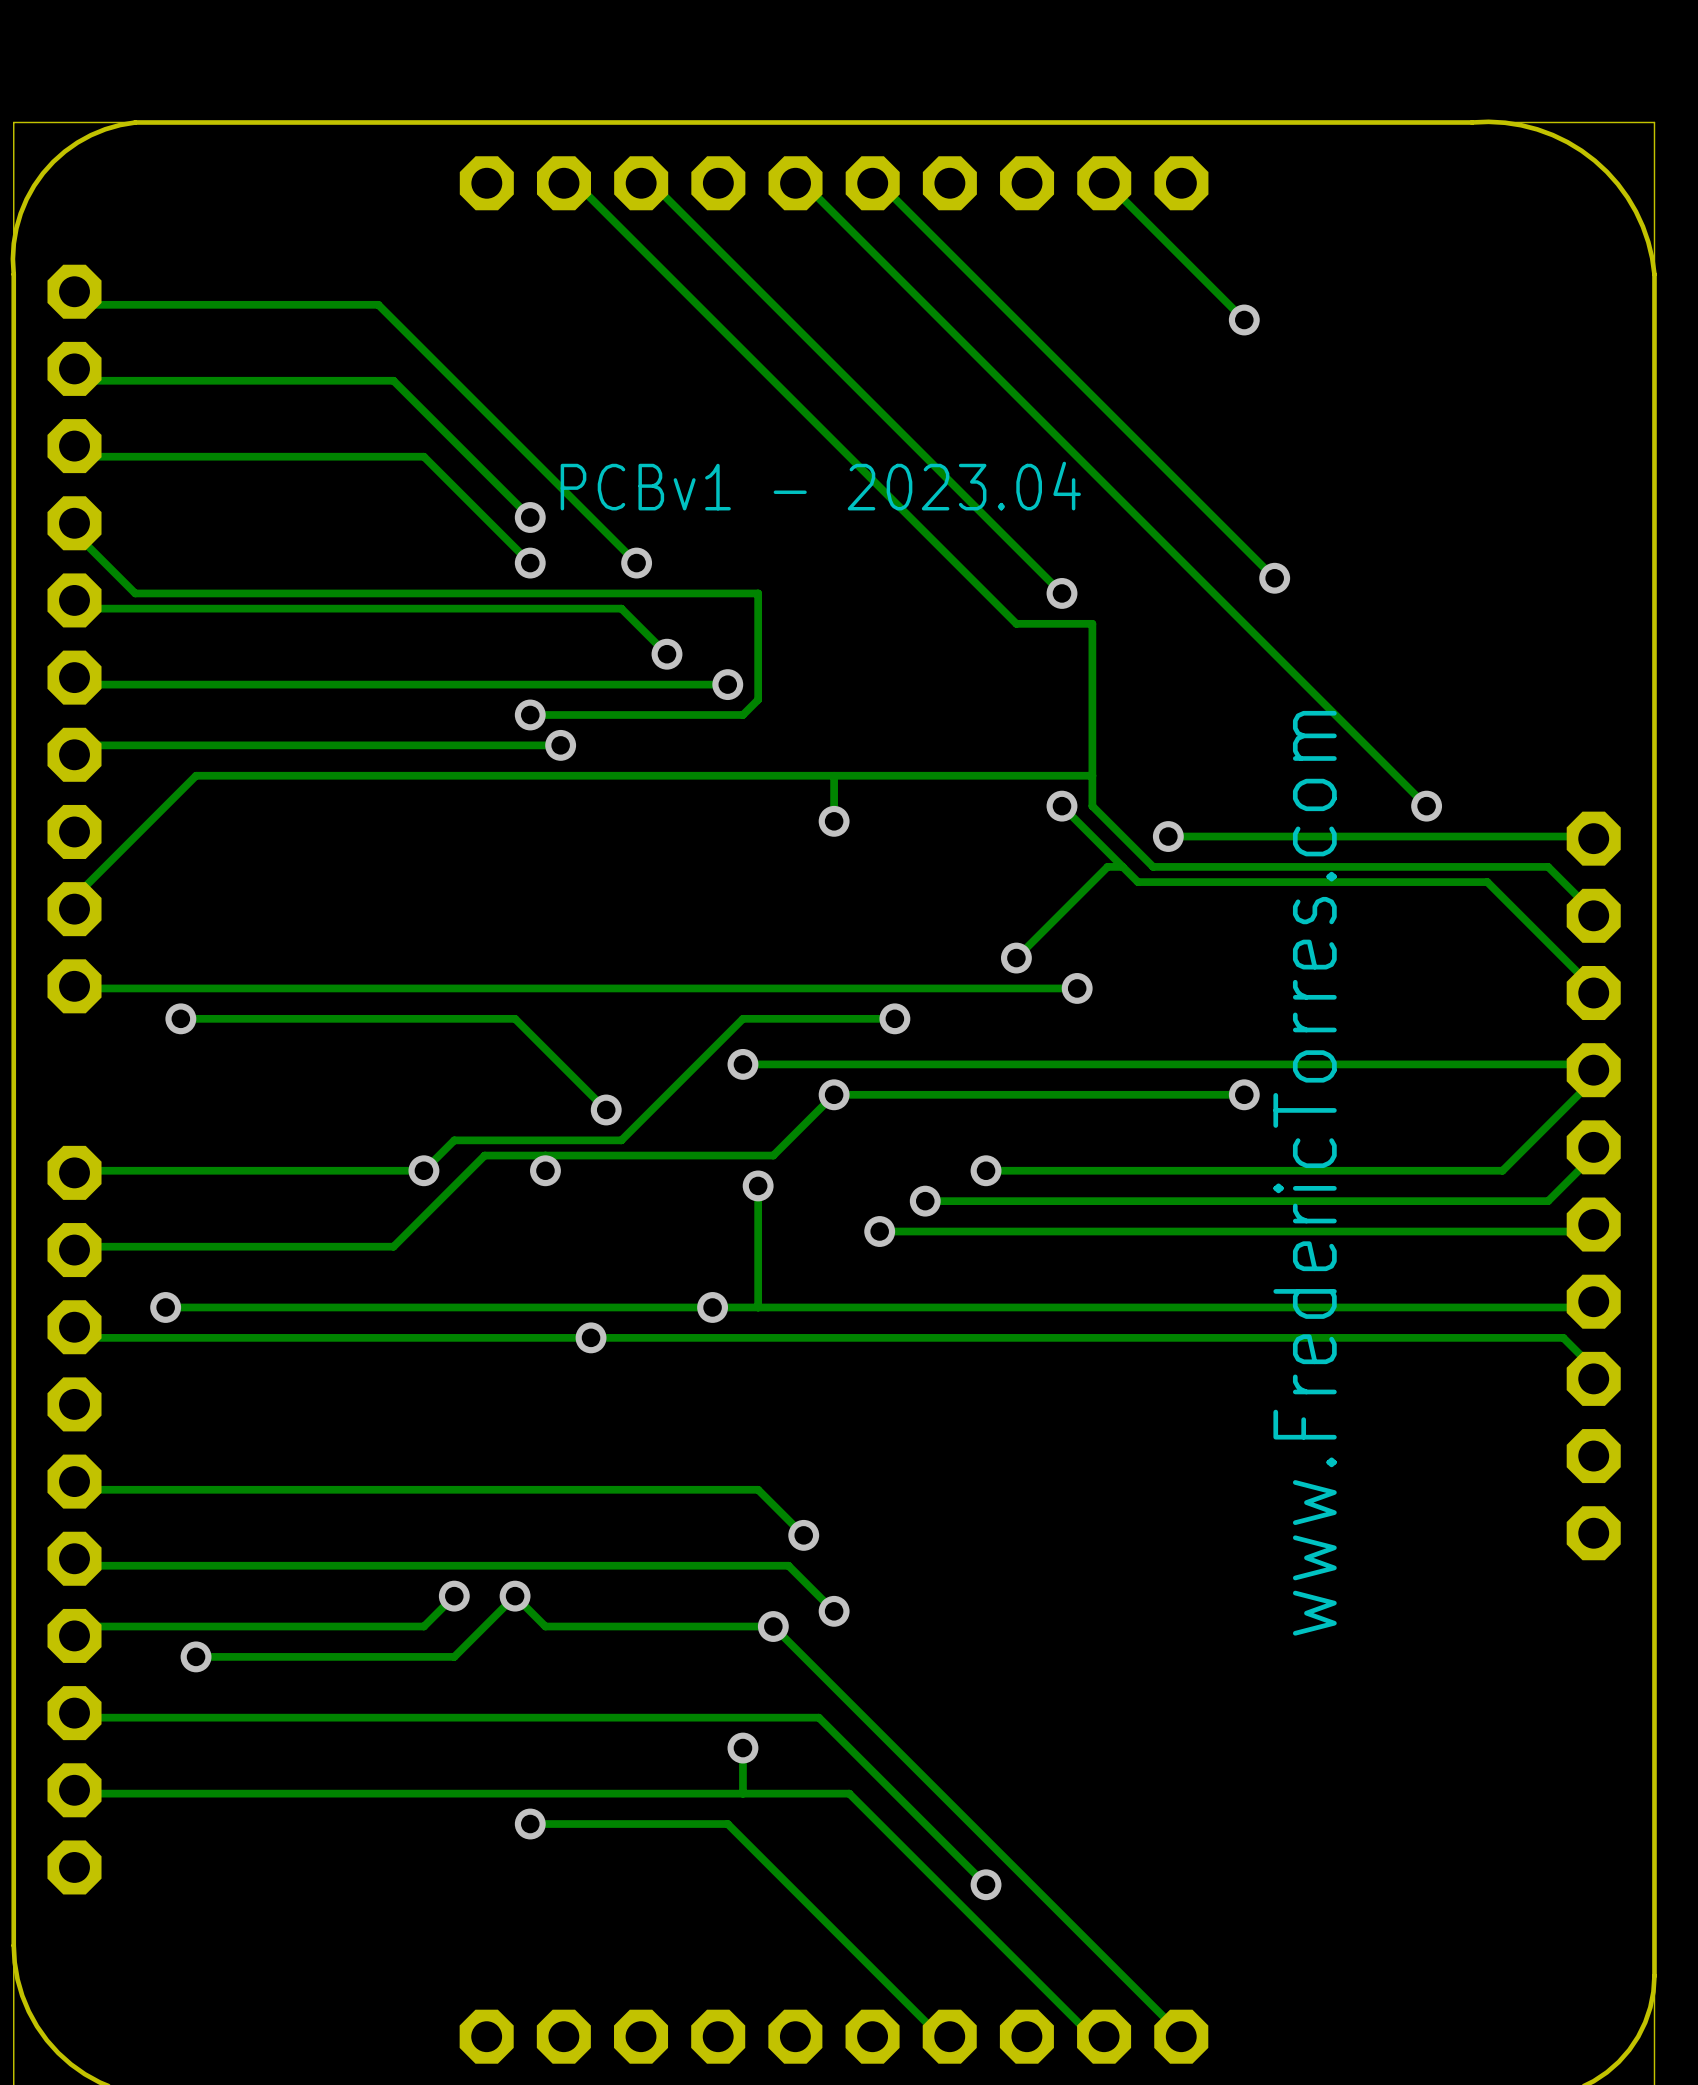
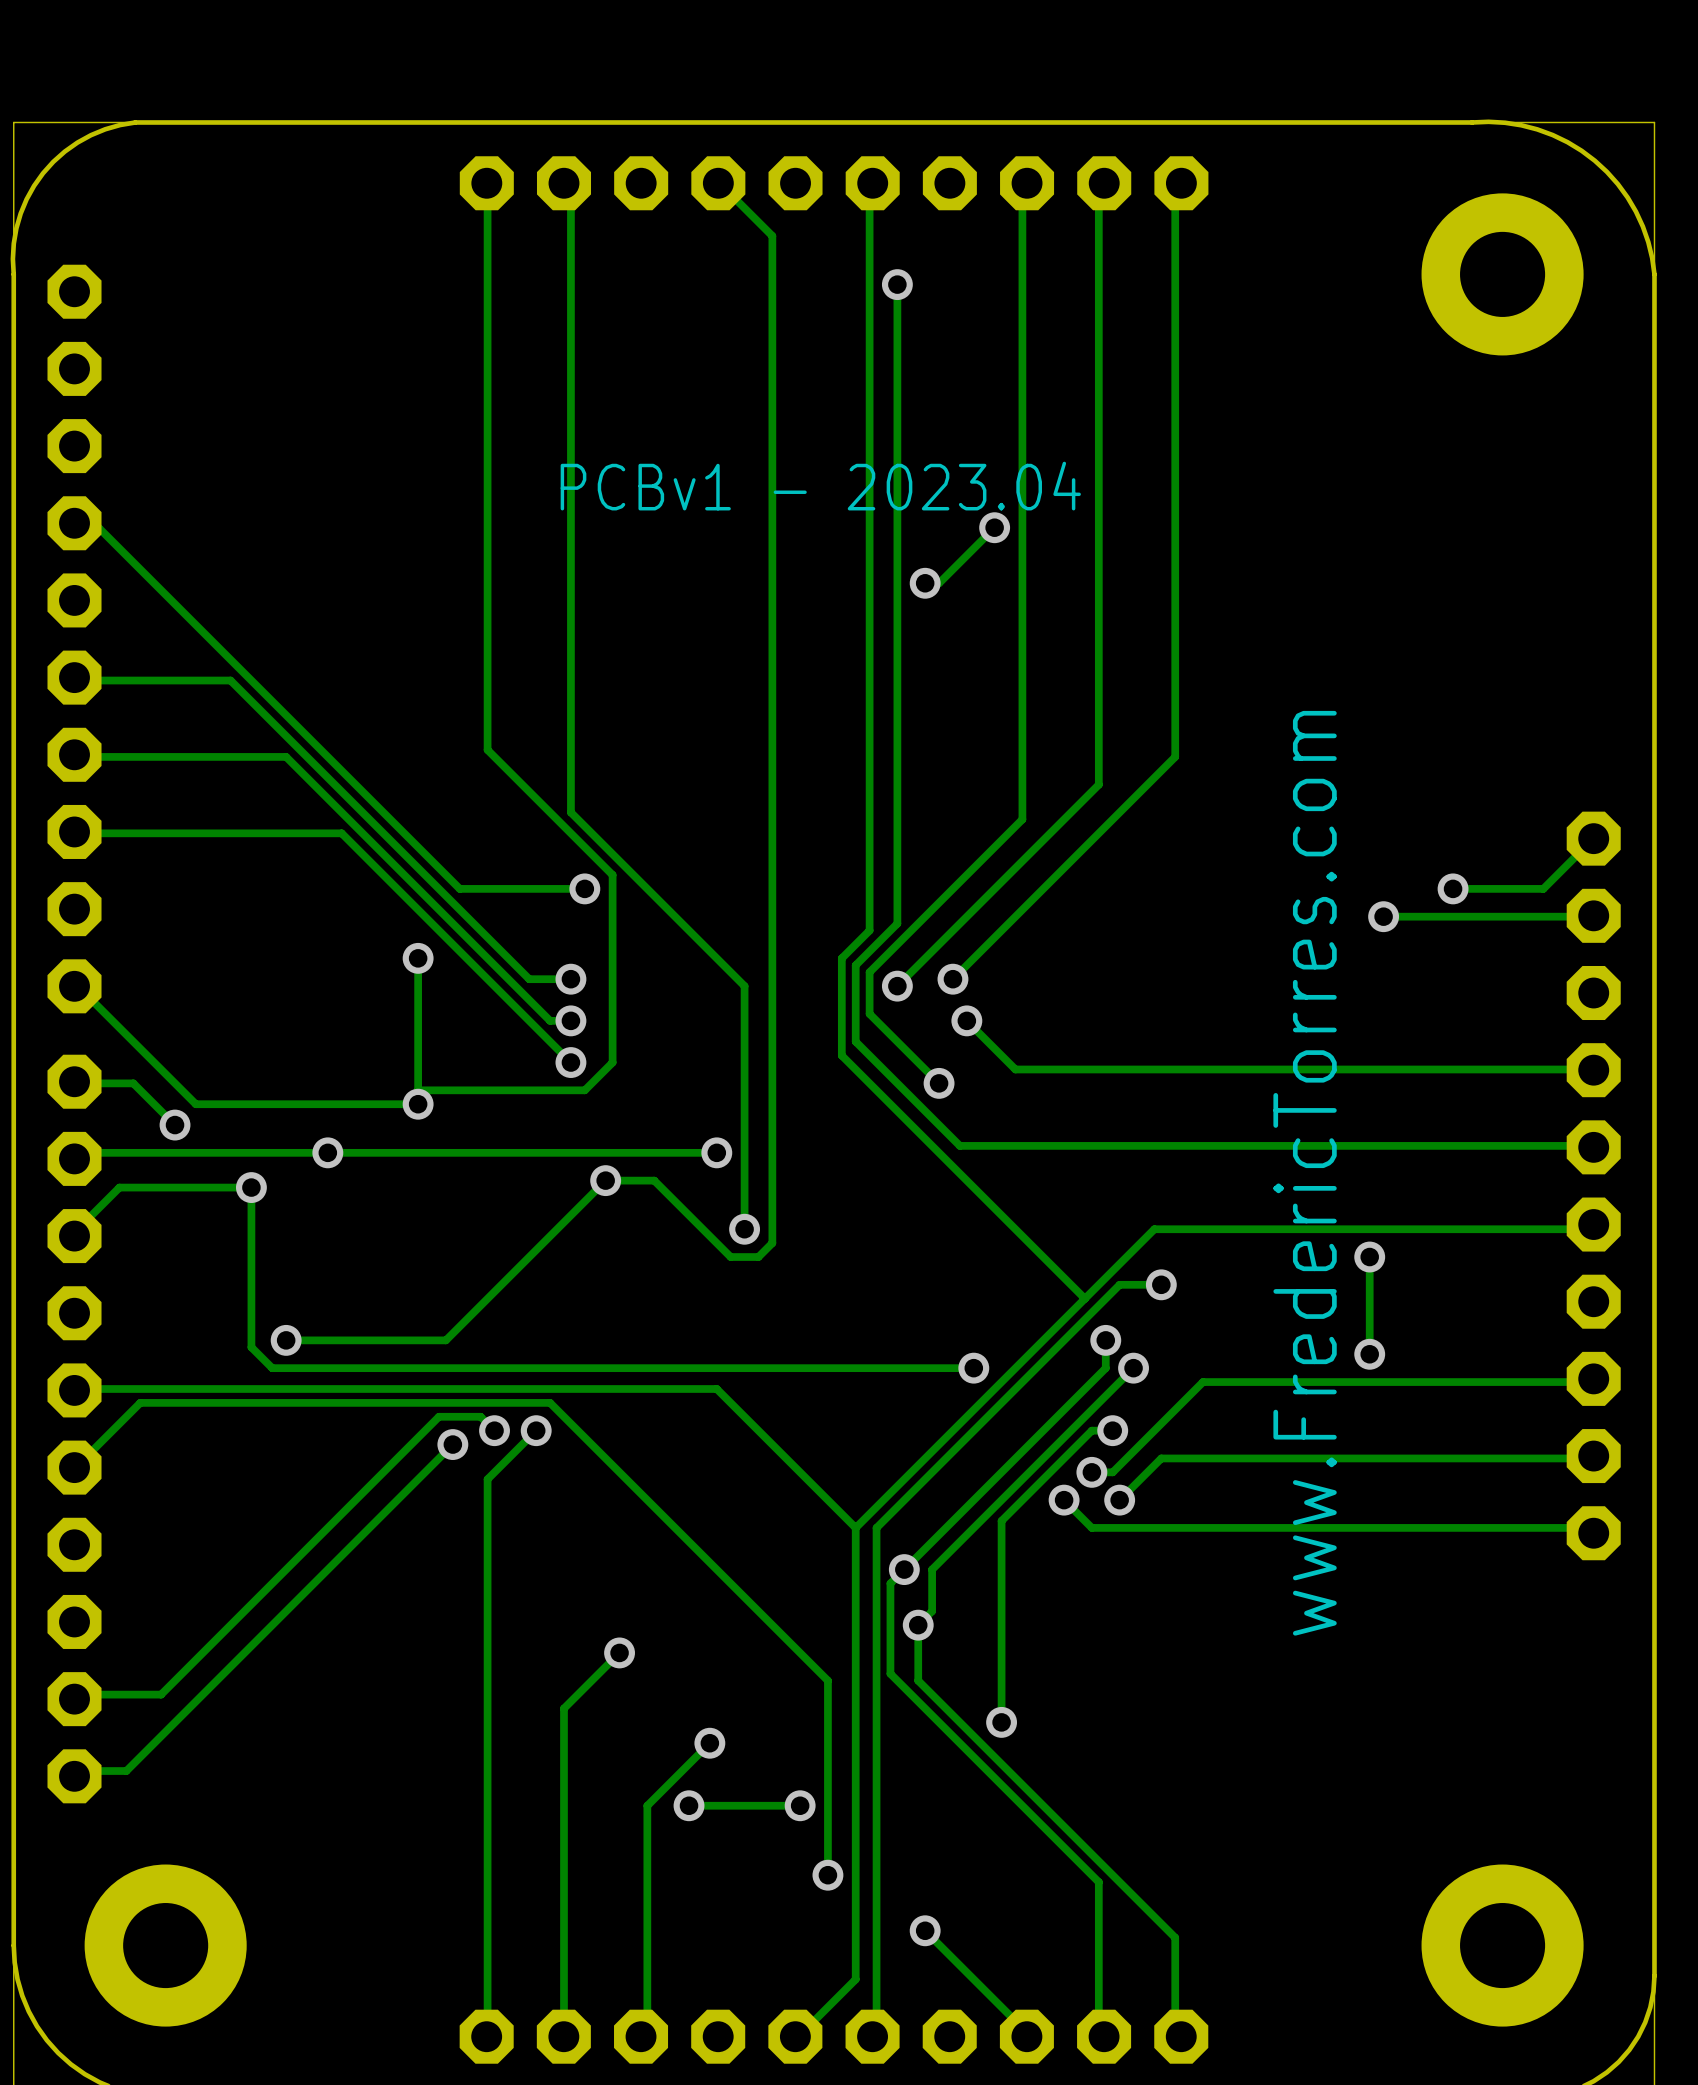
track: none -> (486, 183) (487, 749) (612, 875) (612, 1062) (584, 1090) (418, 1090)
track: (564, 183) (575, 183) (1016, 623) (1092, 623) (1092, 806) (1153, 866) (1548, 866) (1593, 912) (1593, 915) -> (564, 183) (570, 187) (570, 812) (744, 986) (744, 1229)
track: (641, 183) (651, 183) (1061, 593) -> none
track: none -> (718, 183) (772, 235) (772, 1243) (758, 1257) (730, 1257) (654, 1180) (605, 1180) (445, 1340) (286, 1340)
track: (795, 183) (803, 183) (1426, 806) -> none
track: (872, 183) (879, 183) (1274, 578) -> (872, 183) (869, 187) (869, 930) (841, 958) (841, 1055) (1084, 1298)
track: none -> (1027, 183) (1022, 187) (1022, 819) (869, 972) (869, 1013) (939, 1083)
track: (1104, 183) (1107, 183) (1244, 319) -> (1104, 183) (1098, 187) (1098, 784) (897, 986)
track: none -> (1181, 183) (1175, 187) (1175, 756) (952, 979)
part: none -> (1502, 274)
via: none -> (897, 284)
track: (74, 291) (74, 304) (378, 304) (636, 563) -> none
via: (1244, 319) -> none
track: (74, 368) (74, 380) (393, 380) (530, 517) -> none
track: (74, 446) (74, 456) (423, 456) (530, 563) -> none
via: (530, 517) -> none
track: (74, 523) (74, 532) (135, 593) (758, 593) (758, 699) (742, 714) (530, 714) -> (74, 523) (77, 527) (98, 527) (459, 888) (584, 888)
track: none -> (994, 527) (939, 583) (925, 583)
via: none -> (994, 527)
via: (530, 563) -> none
via: (636, 563) -> none
via: (1274, 578) -> none
via: none -> (925, 583)
via: (1061, 593) -> none
track: (74, 600) (74, 608) (621, 608) (667, 654) -> none
via: (667, 654) -> none
track: (74, 677) (74, 684) (727, 684) -> (74, 677) (77, 680) (230, 680) (529, 979) (570, 979)
via: (727, 684) -> none
via: (530, 714) -> none
track: (560, 745) (74, 745) (74, 754) -> (570, 1020) (550, 1020) (286, 756) (77, 756) (74, 754)
via: (560, 745) -> none
track: (834, 775) (834, 821) -> none
track: (1092, 775) (196, 775) (74, 897) (74, 909) -> none
track: (1061, 806) (1137, 882) (1487, 882) (1593, 988) (1593, 993) -> none
via: (1061, 806) -> none
via: (1426, 806) -> none
via: (834, 821) -> none
track: none -> (74, 831) (341, 833) (570, 1062)
track: (1168, 836) (1593, 836) (1593, 838) -> (1453, 888) (1543, 888) (1593, 838)
via: (1168, 836) -> none
track: (1122, 866) (1107, 866) (1016, 958) -> none
via: none -> (584, 888)
via: none -> (1453, 888)
track: none -> (1593, 915) (1383, 916)
via: none -> (1383, 916)
via: none -> (418, 958)
via: (1016, 958) -> none
via: none -> (570, 979)
via: none -> (952, 979)
track: (74, 986) (74, 988) (1077, 988) -> (74, 986) (77, 986) (195, 1104) (418, 1104) (418, 958)
via: (1077, 988) -> none
track: (180, 1018) (515, 1018) (606, 1109) -> none
via: (180, 1018) -> none
track: (894, 1018) (742, 1018) (621, 1140) (454, 1140) (423, 1170) (74, 1170) (74, 1172) -> none
via position: (894, 1018) -> (897, 986)
via: none -> (570, 1020)
track: none -> (966, 1020) (1015, 1069) (1593, 1070)
via: none -> (966, 1020)
via: none -> (570, 1062)
track: (742, 1064) (1593, 1064) (1593, 1079) (1502, 1170) (986, 1170) -> none
via: (742, 1064) -> none
track: none -> (74, 1081) (77, 1083) (133, 1083) (175, 1125)
via: none -> (939, 1083)
via: (834, 1094) -> none
track: (1244, 1094) (834, 1094) (773, 1155) (484, 1155) (393, 1246) (74, 1246) (74, 1250) -> none
via: (1244, 1094) -> none
via: none -> (418, 1104)
via: (606, 1109) -> none
via: none -> (175, 1125)
track: (1593, 1147) (1593, 1155) (1548, 1201) (925, 1201) -> (1593, 1147) (959, 1145) (855, 1041) (855, 965) (897, 923) (897, 284)
via: none -> (327, 1152)
track: none -> (716, 1152) (77, 1152) (74, 1158)
via: none -> (716, 1152)
via: (423, 1170) -> none
via: (545, 1170) -> none
via: (986, 1170) -> none
via: none -> (605, 1180)
track: (758, 1185) (758, 1307) -> none
via: (758, 1185) -> none
via: none -> (251, 1187)
via: (925, 1201) -> none
track: (1593, 1224) (1593, 1231) (879, 1231) -> (1593, 1224) (1591, 1229) (1154, 1229) (855, 1527)
via: none -> (744, 1229)
via: (879, 1231) -> none
track: none -> (74, 1236) (77, 1229) (119, 1187) (251, 1187) (251, 1347) (272, 1368) (973, 1368)
track: none -> (1369, 1257) (1369, 1354)
via: none -> (1369, 1257)
track: none -> (1161, 1284) (1119, 1284) (876, 1527) (876, 2034) (872, 2036)
via: none -> (1161, 1284)
track: (1593, 1301) (1593, 1307) (165, 1307) -> none
via: (165, 1307) -> none
via: (712, 1307) -> none
track: (74, 1327) (74, 1337) (1563, 1337) (1593, 1368) (1593, 1378) -> (1091, 1472) (1112, 1472) (1203, 1382) (1591, 1382) (1593, 1378)
via: (591, 1337) -> none
via: none -> (286, 1340)
via: none -> (1105, 1340)
via: none -> (1369, 1354)
via: none -> (973, 1368)
via: none -> (1133, 1368)
track: none -> (74, 1390) (716, 1388) (855, 1527)
track: none -> (494, 1430) (480, 1416) (438, 1416) (161, 1694) (77, 1694) (74, 1699)
via: none -> (494, 1430)
track: none -> (536, 1430) (487, 1479) (486, 2036)
via: none -> (536, 1430)
track: none -> (1112, 1430) (1091, 1430) (1001, 1520) (1001, 1722)
via: none -> (1112, 1430)
track: none -> (452, 1444) (126, 1771) (77, 1771) (74, 1776)
via: none -> (452, 1444)
track: none -> (1593, 1456) (1591, 1458) (1161, 1458) (1119, 1500)
track: none -> (74, 1467) (140, 1402) (550, 1402) (827, 1680) (827, 1875)
via: none -> (1091, 1472)
track: (74, 1481) (74, 1489) (758, 1489) (803, 1535) -> none
track: none -> (1064, 1500) (1091, 1527) (1591, 1527) (1593, 1533)
via: none -> (1064, 1500)
via: none -> (1119, 1500)
part position: (74, 1520) -> (74, 1429)
track: none -> (855, 1527) (855, 1979) (800, 2034) (795, 2036)
via: (803, 1535) -> none
track: (74, 1558) (74, 1565) (788, 1565) (834, 1611) -> none
via: none -> (904, 1569)
track: (454, 1596) (423, 1626) (74, 1626) (74, 1635) -> none
via: (454, 1596) -> none
via: (515, 1596) -> none
via: (834, 1611) -> none
via: none -> (918, 1625)
via: (773, 1626) -> none
track: none -> (619, 1652) (563, 1708) (563, 2036)
via: none -> (619, 1652)
track: (196, 1656) (454, 1656) (515, 1596) (545, 1626) (773, 1626) (1183, 2036) (1181, 2036) -> (1133, 1368) (932, 1569) (932, 1611) (918, 1625) (918, 1680) (1175, 1937) (1175, 2034) (1181, 2036)
via: (196, 1656) -> none
track: (74, 1713) (74, 1717) (818, 1717) (986, 1884) -> none
via: none -> (1001, 1722)
track: none -> (709, 1743) (647, 1805) (647, 2034) (641, 2036)
track: (742, 1748) (742, 1793) -> none
via position: (742, 1748) -> (709, 1743)
track: (74, 1790) (74, 1793) (849, 1793) (1092, 2036) (1104, 2036) -> (1105, 1340) (1105, 1368) (890, 1583) (890, 1673) (1098, 1882) (1098, 2034) (1104, 2036)
via: none -> (689, 1805)
track: none -> (800, 1805) (689, 1805)
via: none -> (800, 1805)
track: (530, 1824) (727, 1824) (940, 2036) (949, 2036) -> none
via: (530, 1824) -> none
via: none -> (827, 1875)
via position: (986, 1884) -> (925, 1930)
track: none -> (925, 1930) (1029, 2034) (1026, 2036)
part: none -> (165, 1945)
part: none -> (1502, 1945)

